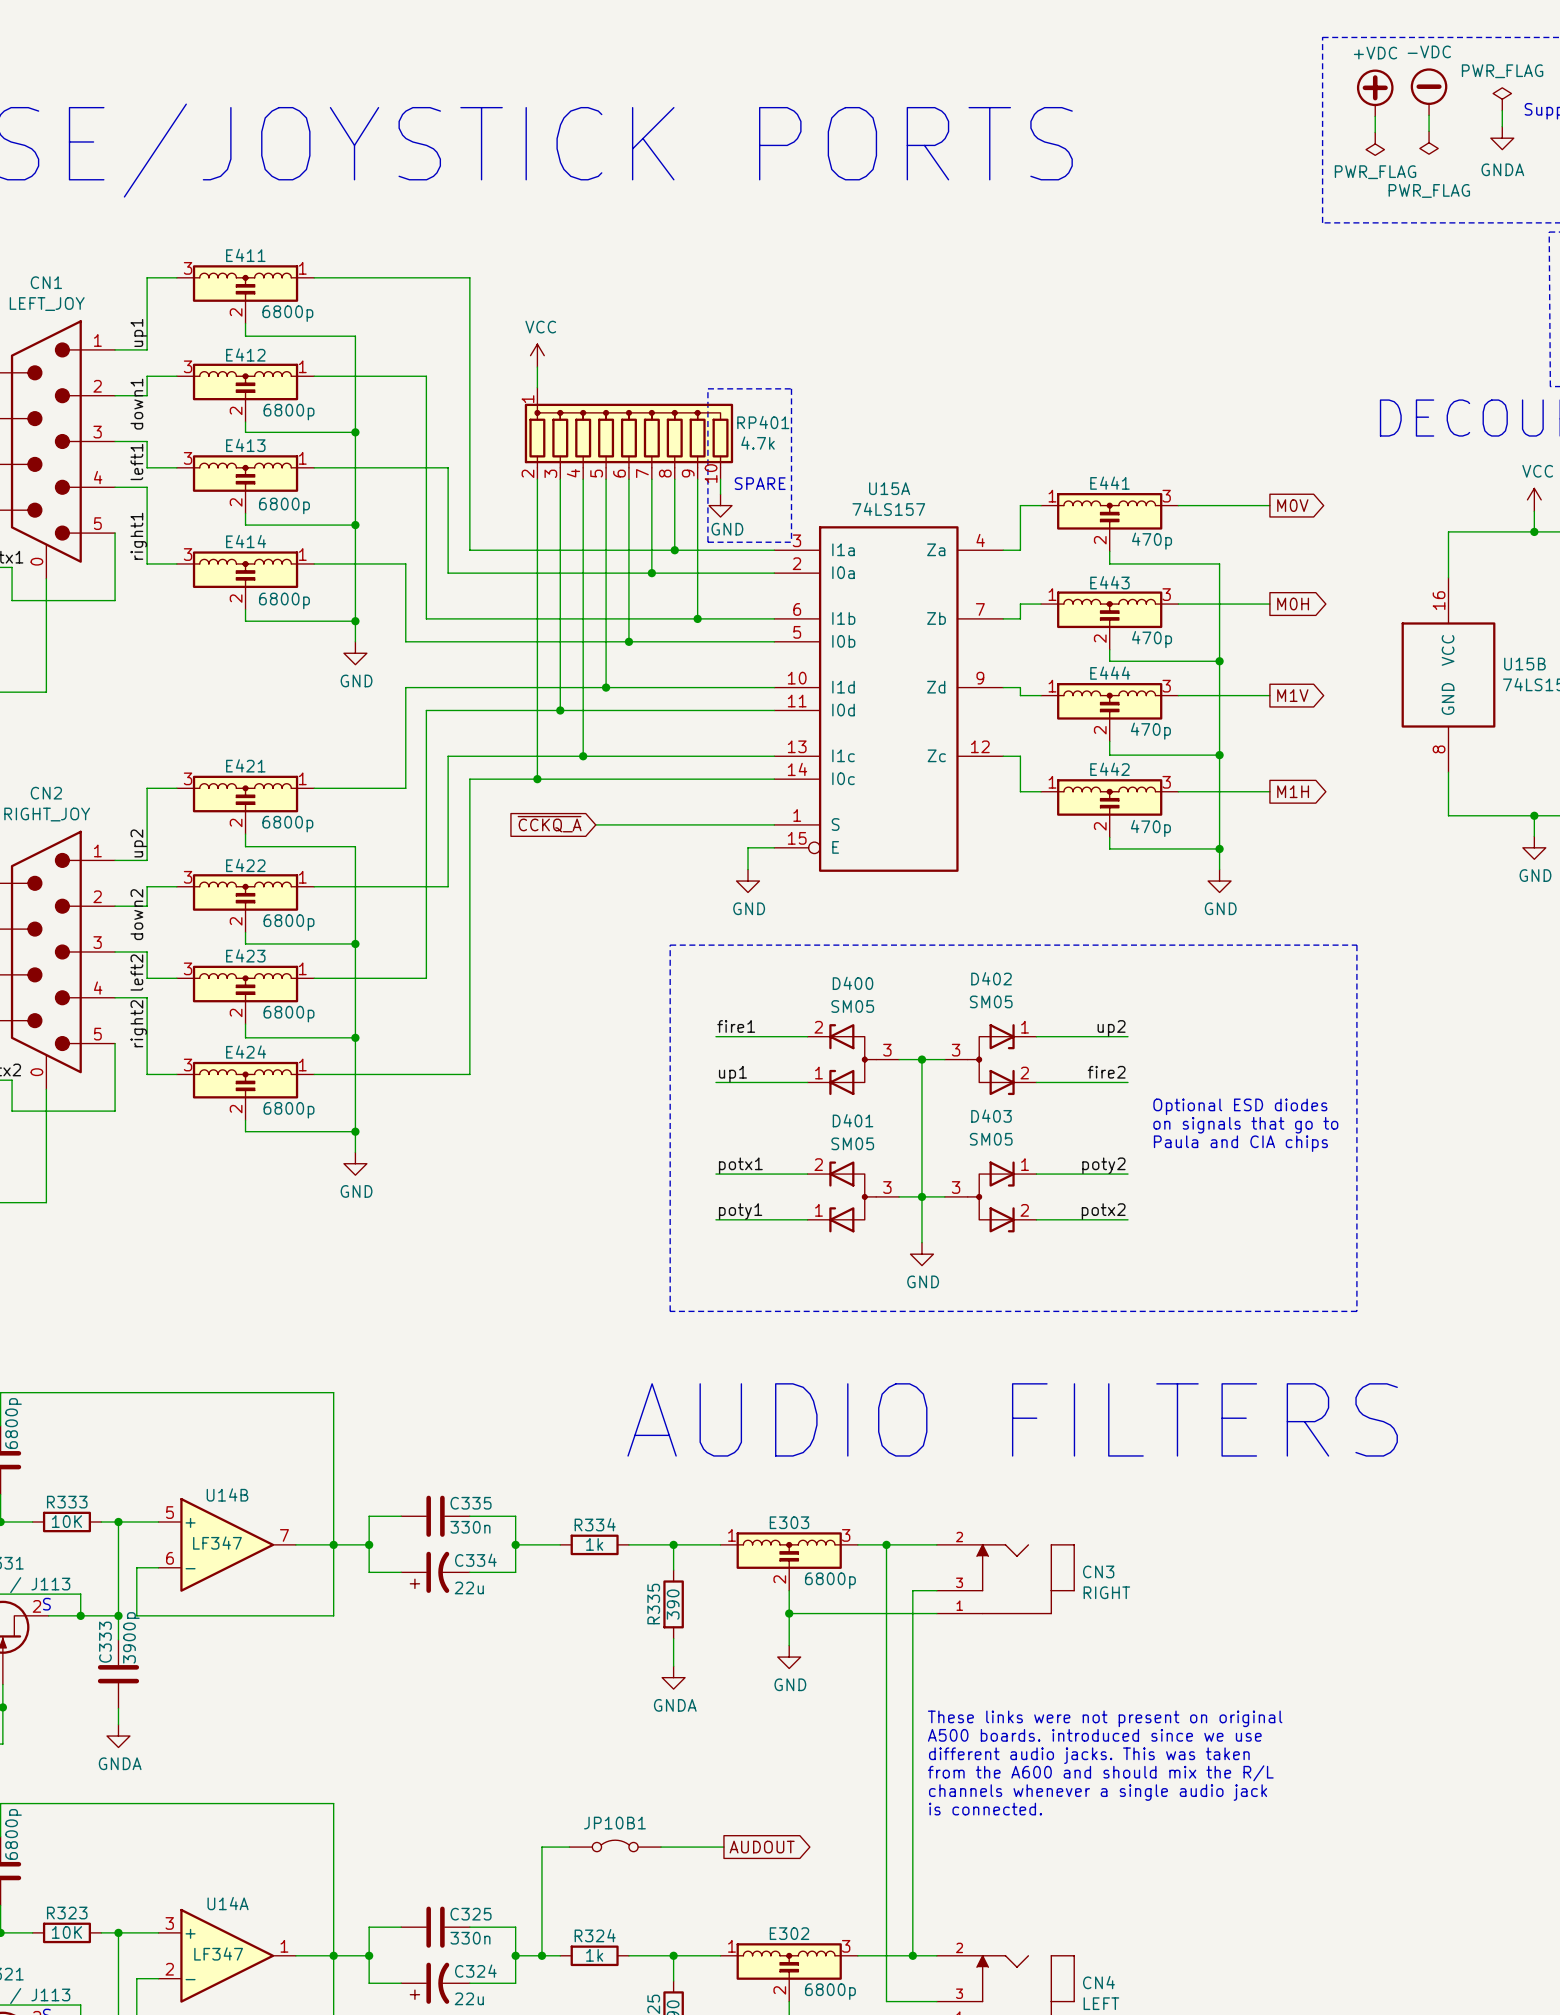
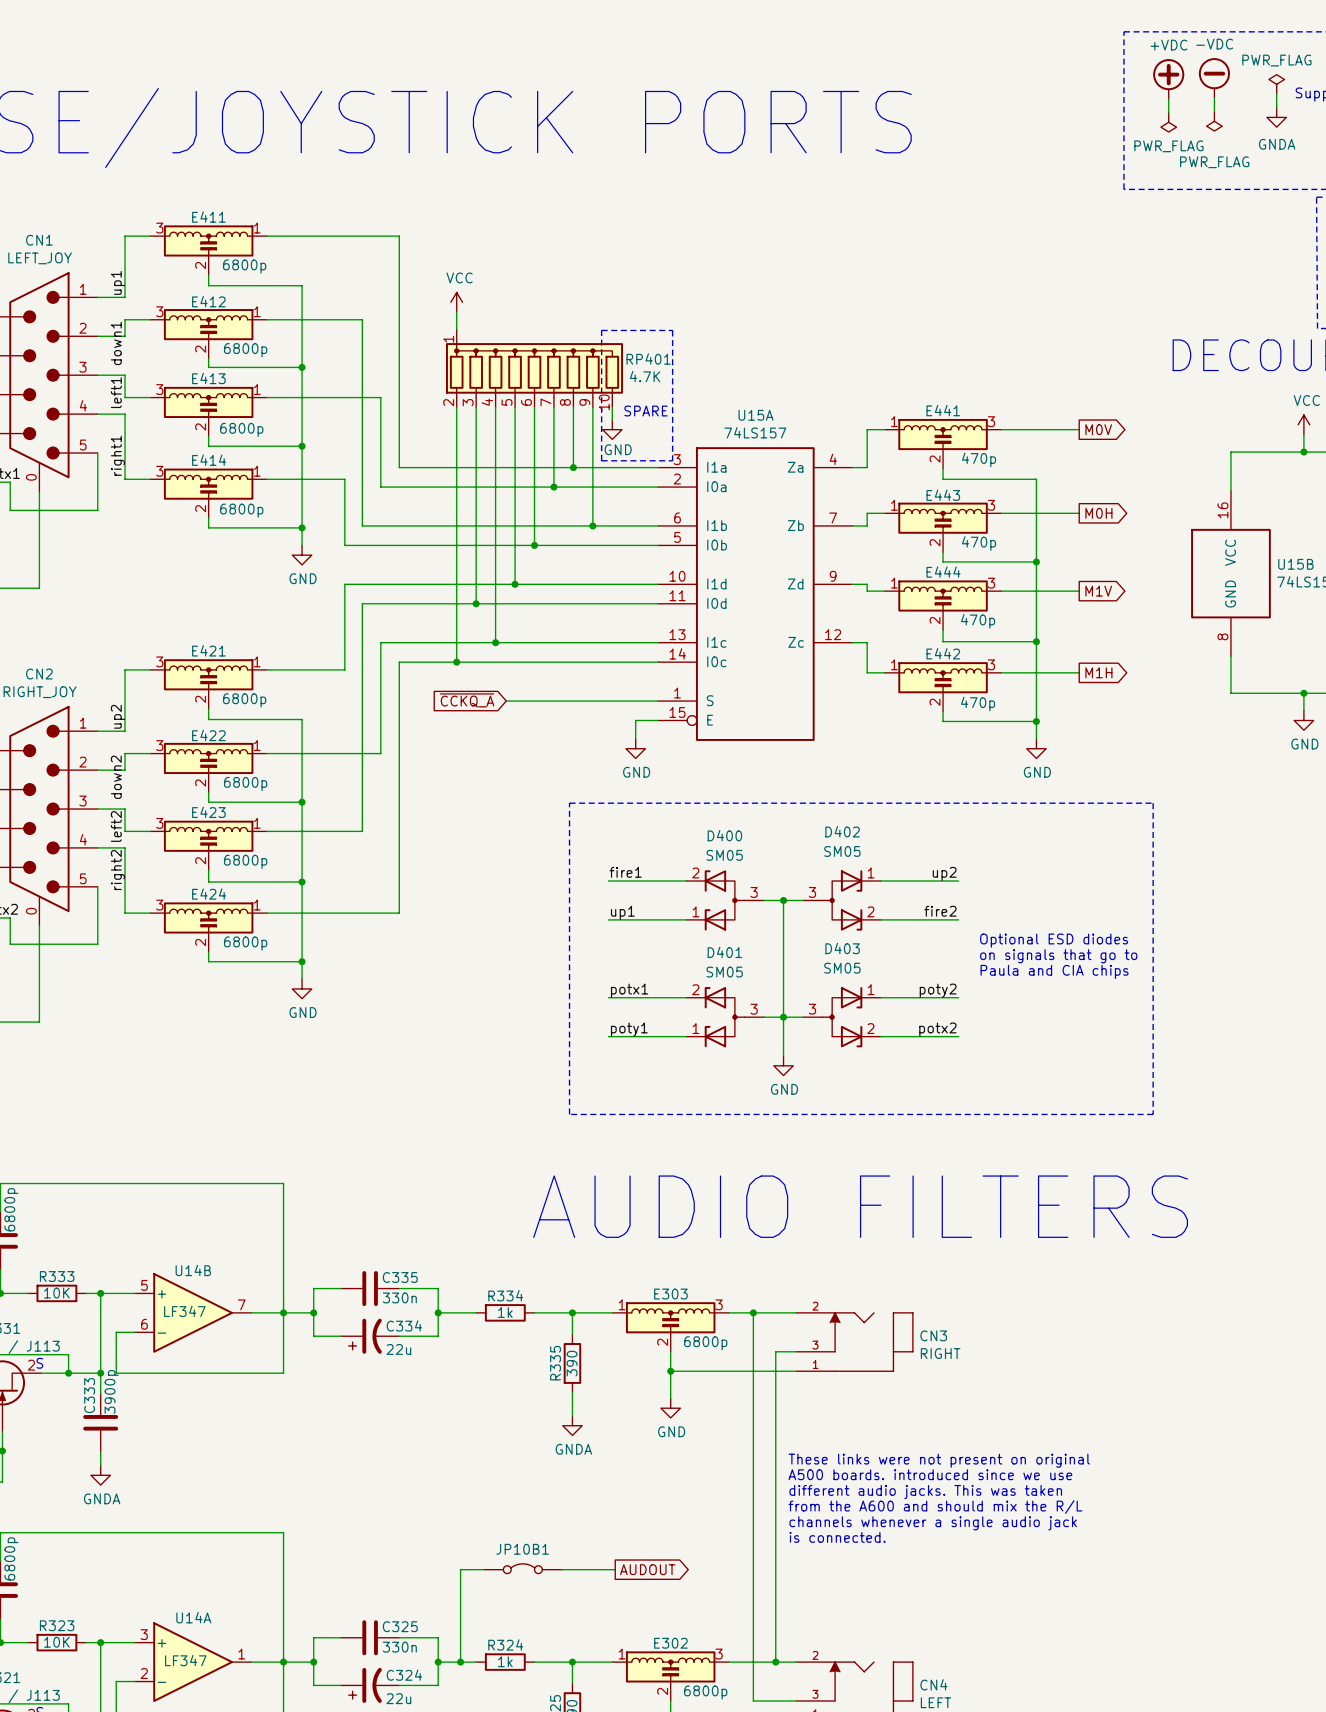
RP401 value: 4.7k (758, 443) -> 4.7K (645, 376)

